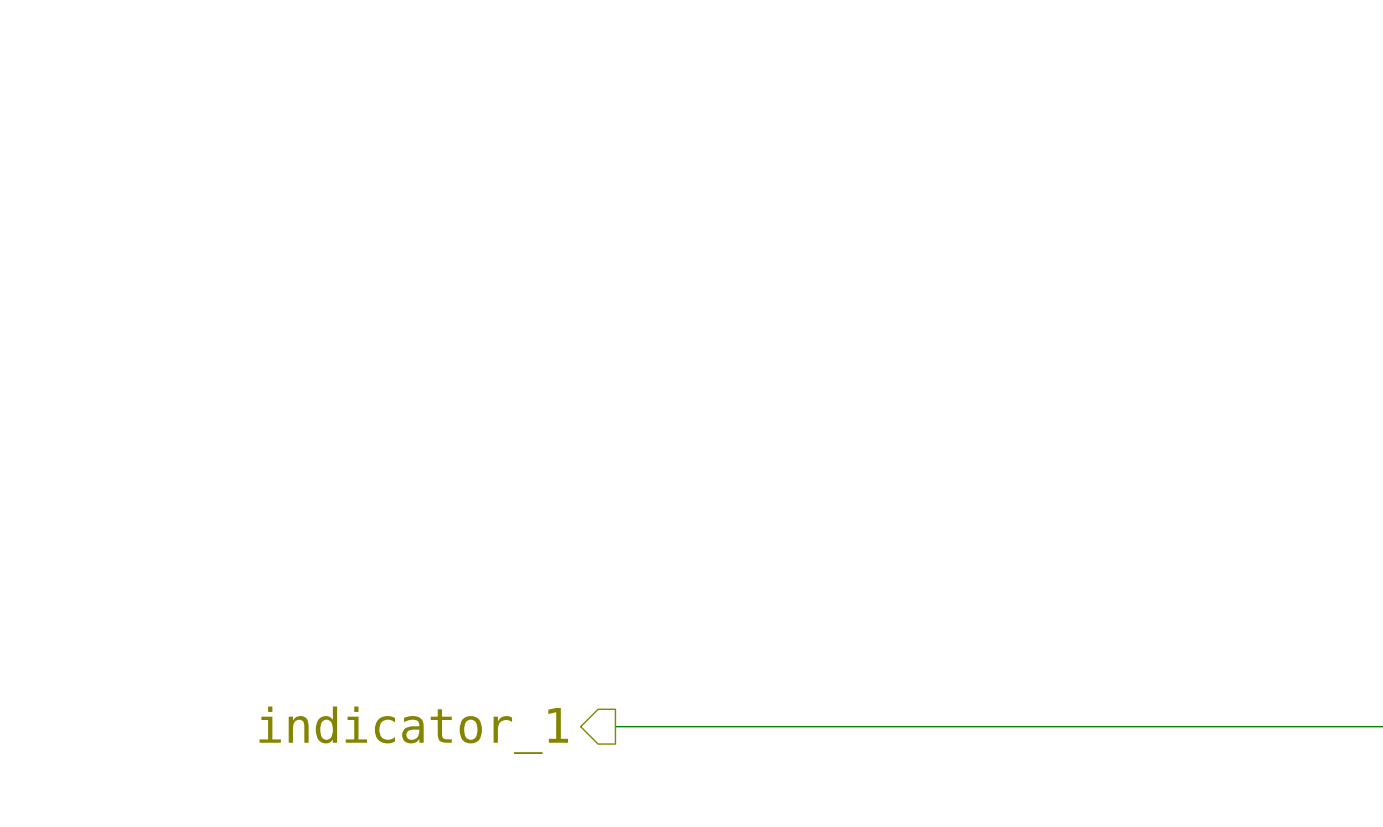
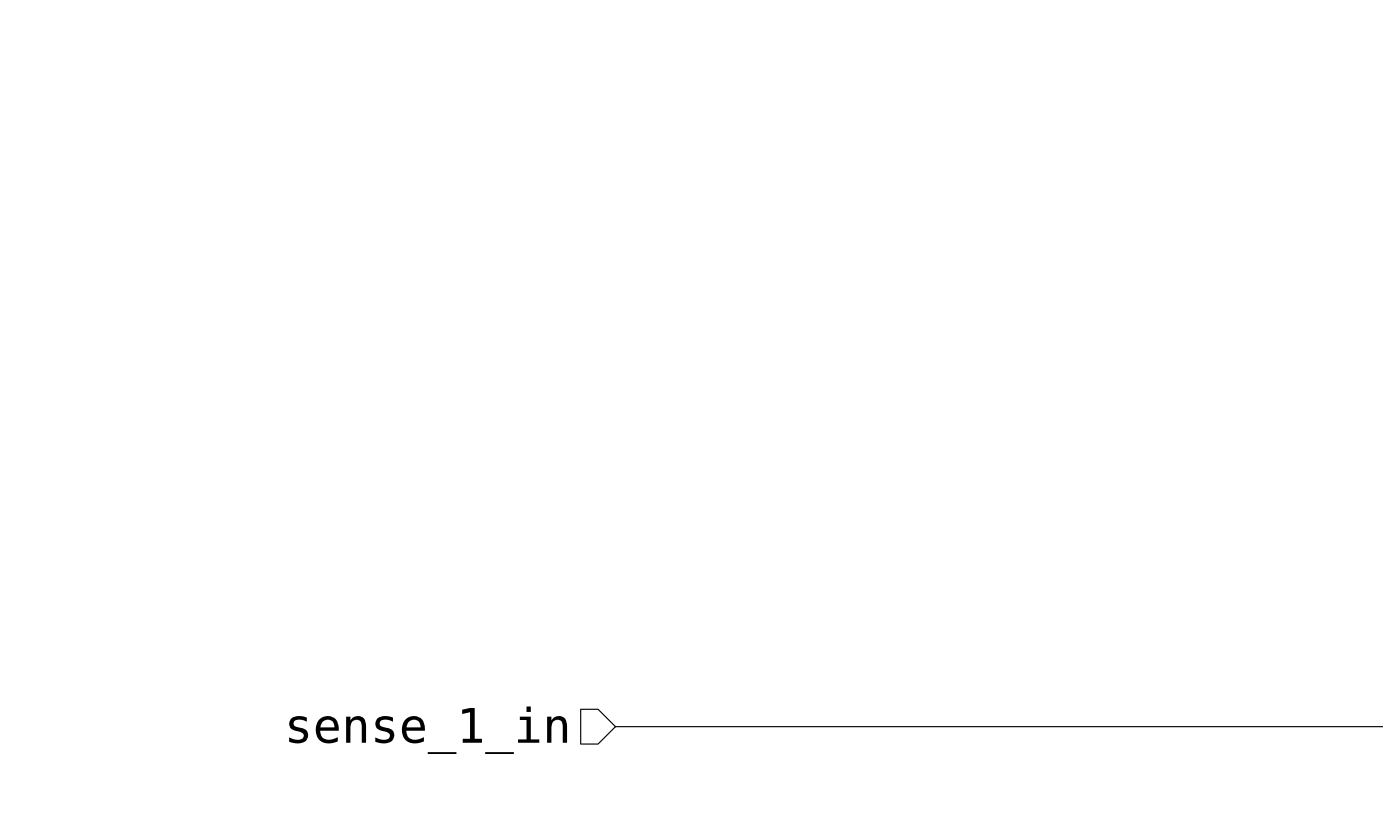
hierarchical label shape: output (413, 730) -> input (428, 730)
hierarchical label: indicator_1 (413, 730) -> sense_1_in (428, 730)

